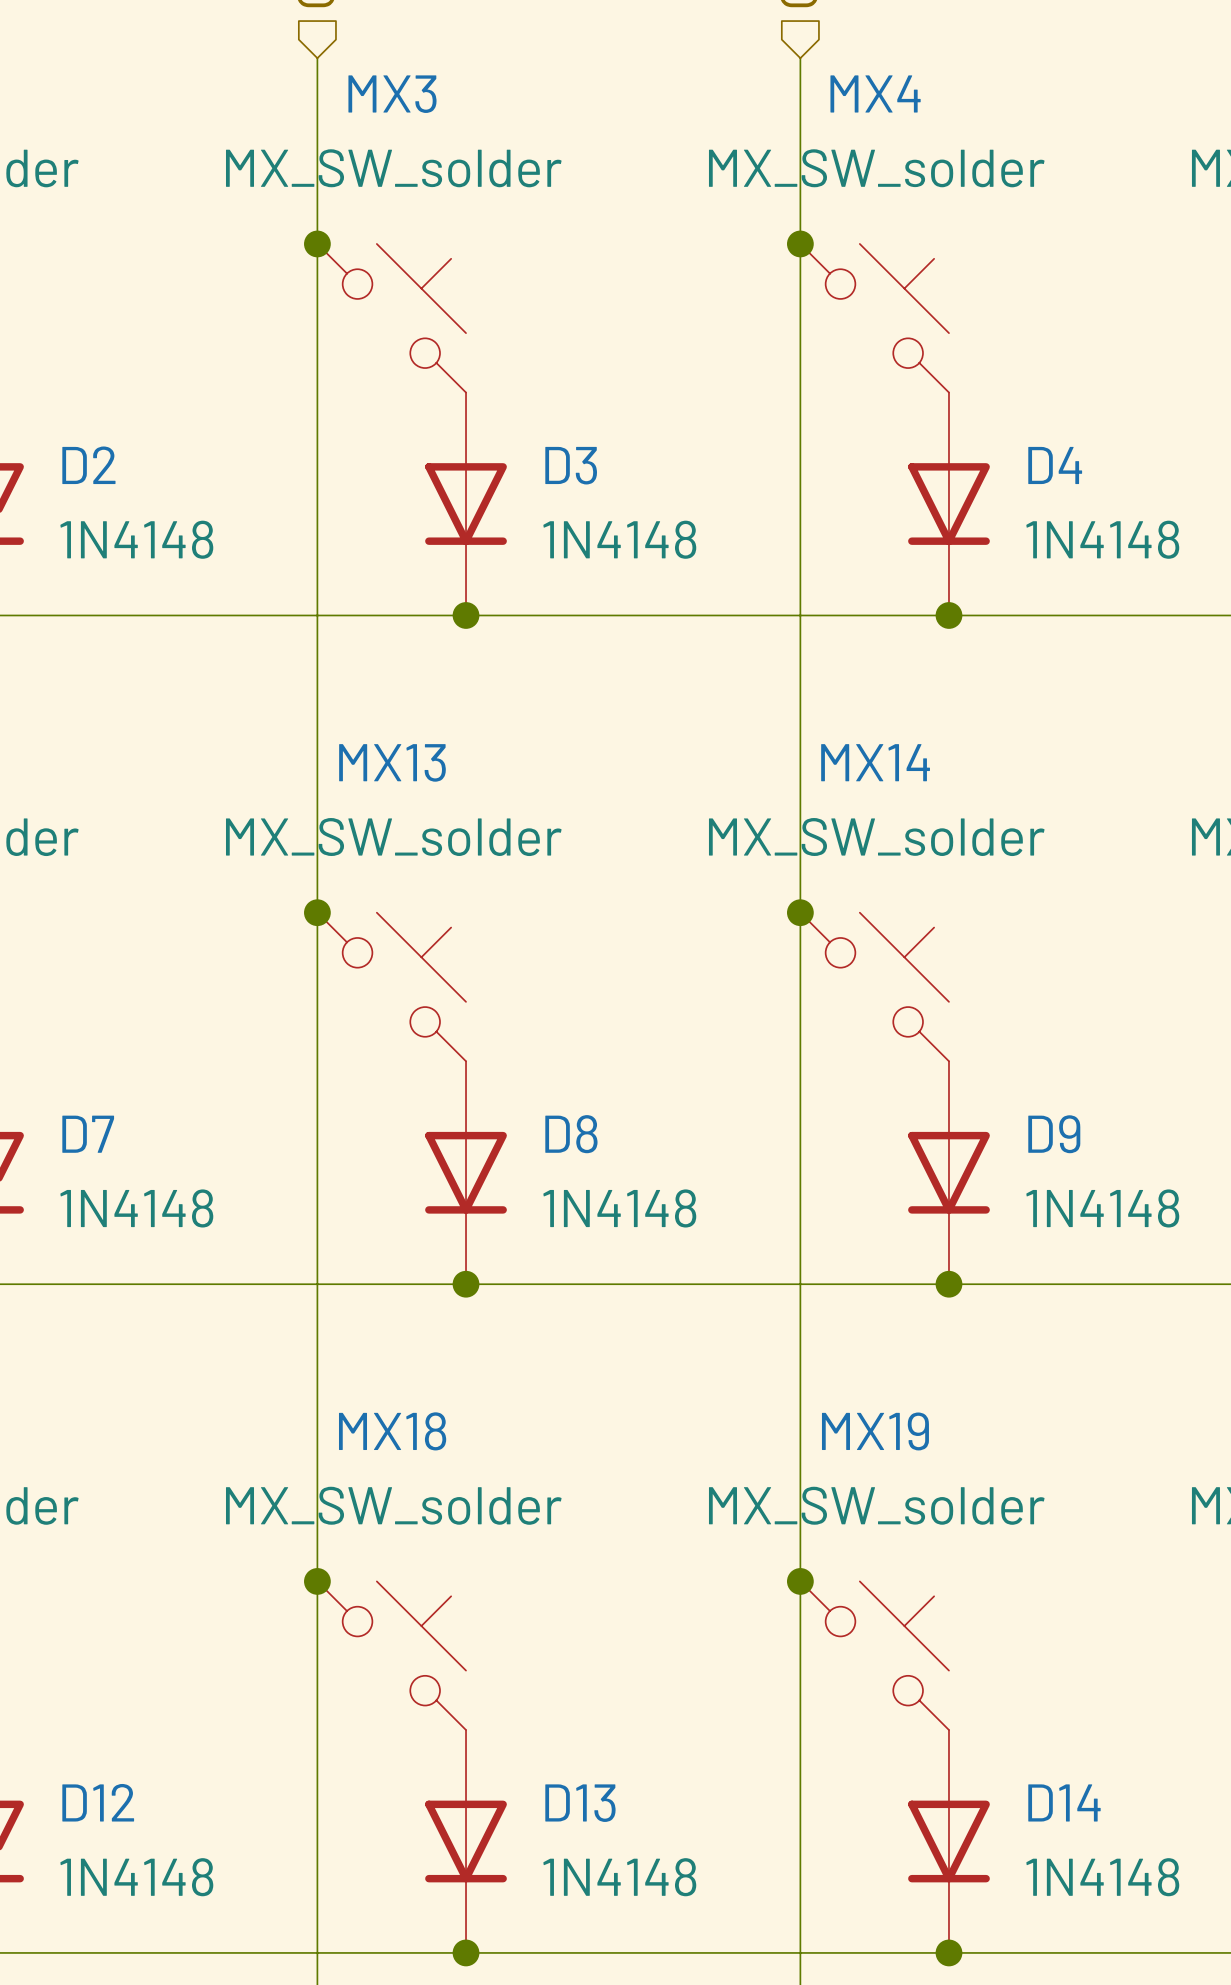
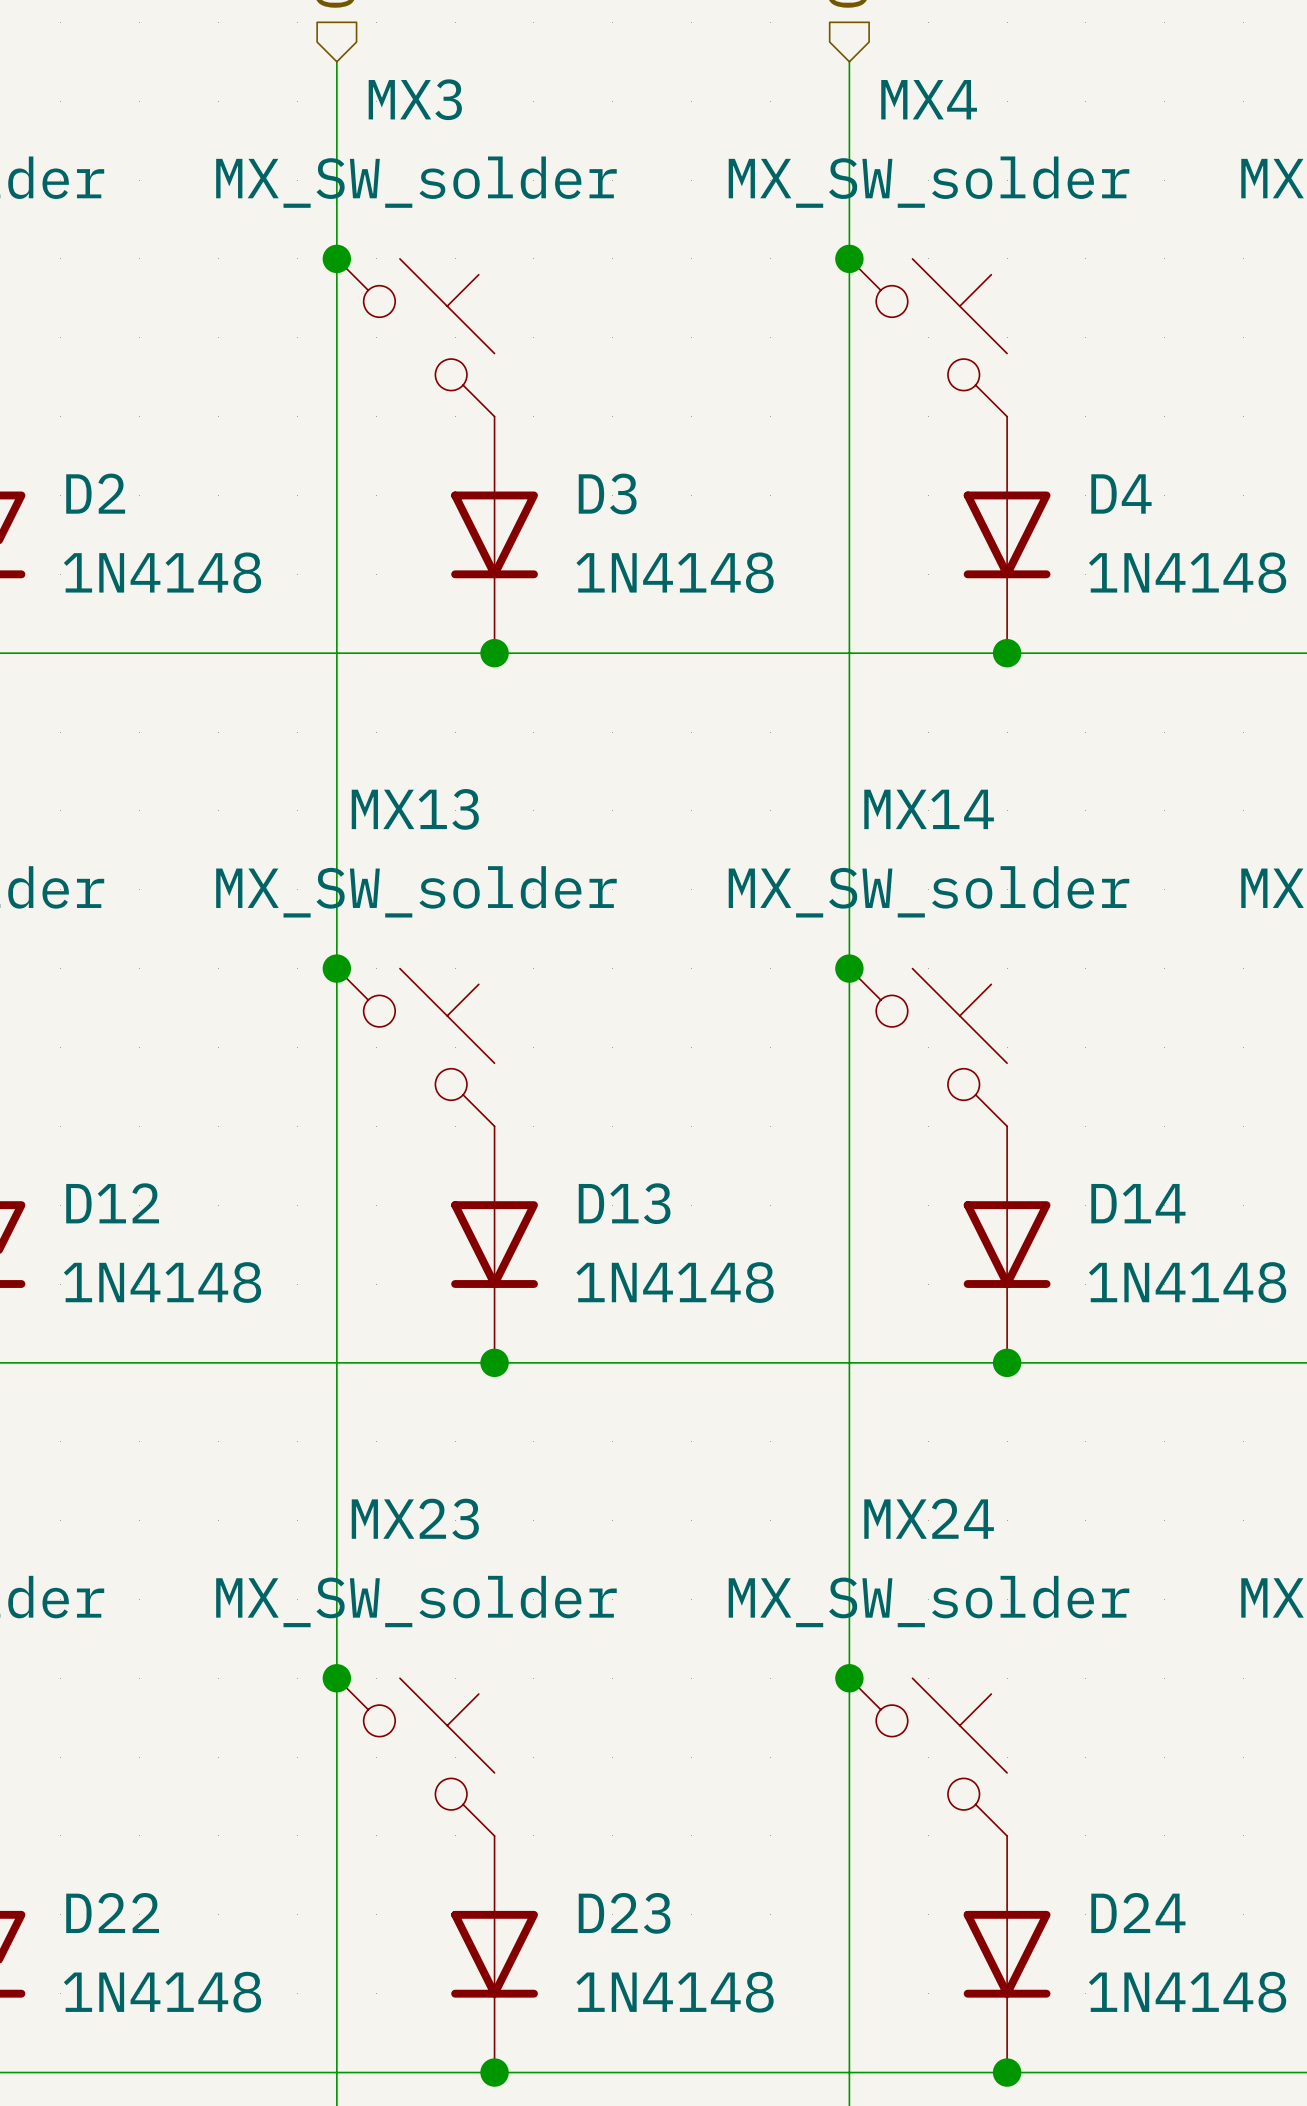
D7 name: D7 (88, 1134) -> D12 (112, 1203)
D8 name: D8 (571, 1134) -> D13 (624, 1203)
D9 name: D9 (1054, 1134) -> D14 (1138, 1203)
MX18 name: MX18 (392, 1431) -> MX23 (415, 1519)
MX19 name: MX19 (875, 1431) -> MX24 (929, 1518)
D12 name: D12 (98, 1802) -> D22 (112, 1913)
D14 name: D14 (1064, 1802) -> D24 (1138, 1913)
D13 name: D13 (580, 1803) -> D23 (624, 1913)

